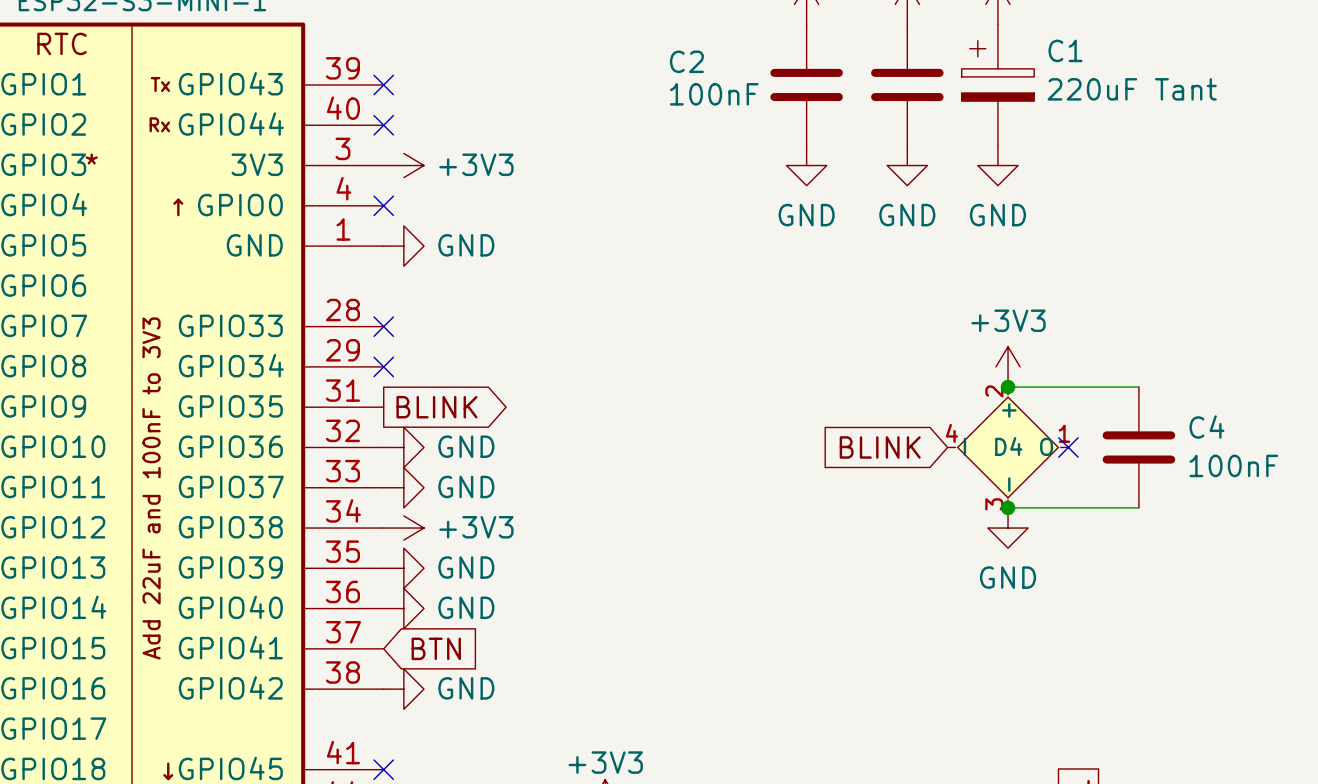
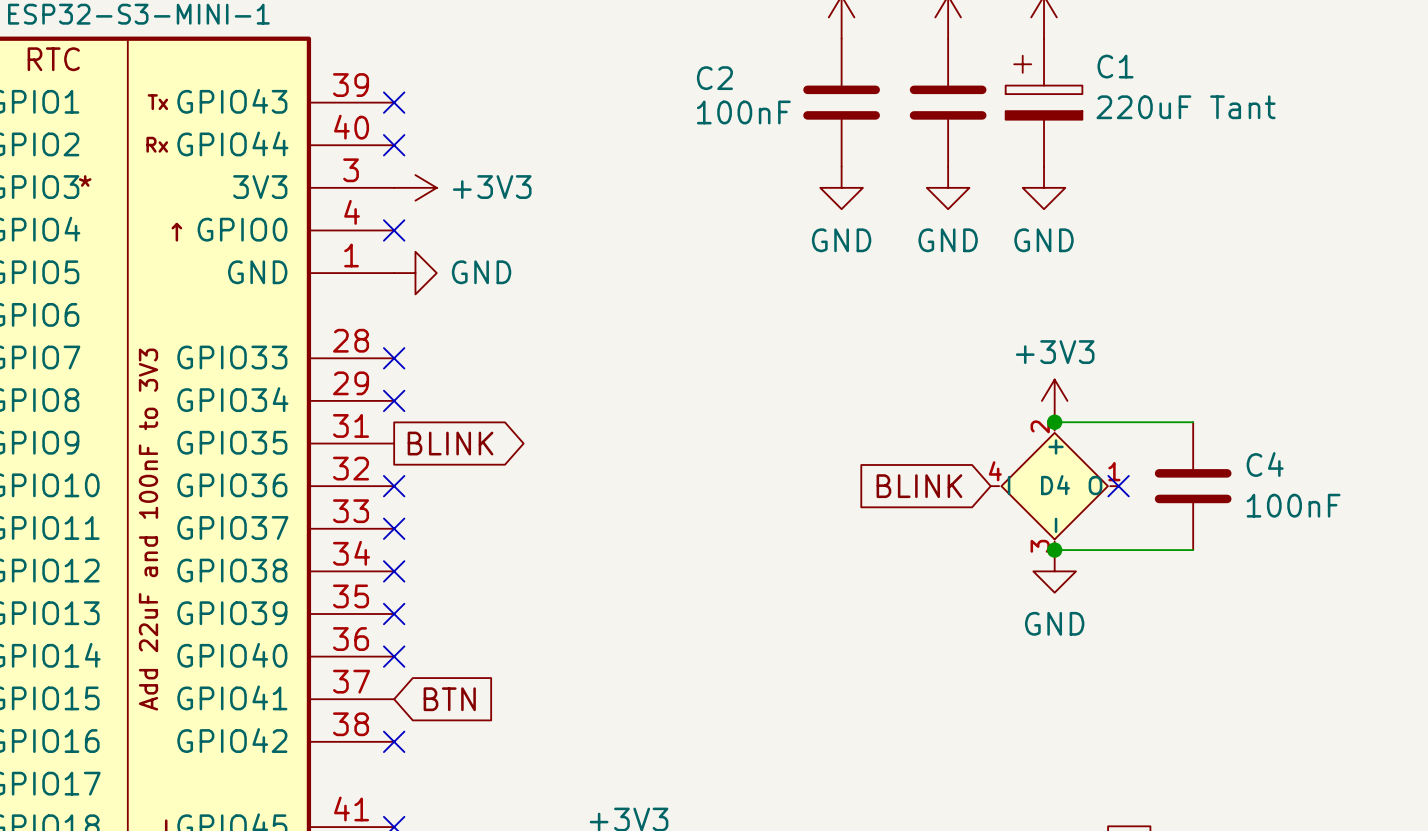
no-connect mark: none -> (394, 486)
power symbol: GND (403, 447) -> none
no-connect mark: none -> (394, 528)
power symbol: GND (403, 487) -> none
no-connect mark: none -> (394, 571)
power symbol: +3V3 (403, 528) -> none
no-connect mark: none -> (394, 613)
power symbol: GND (403, 568) -> none
no-connect mark: none -> (394, 656)
power symbol: GND (403, 608) -> none
no-connect mark: none -> (394, 741)
power symbol: GND (403, 689) -> none

